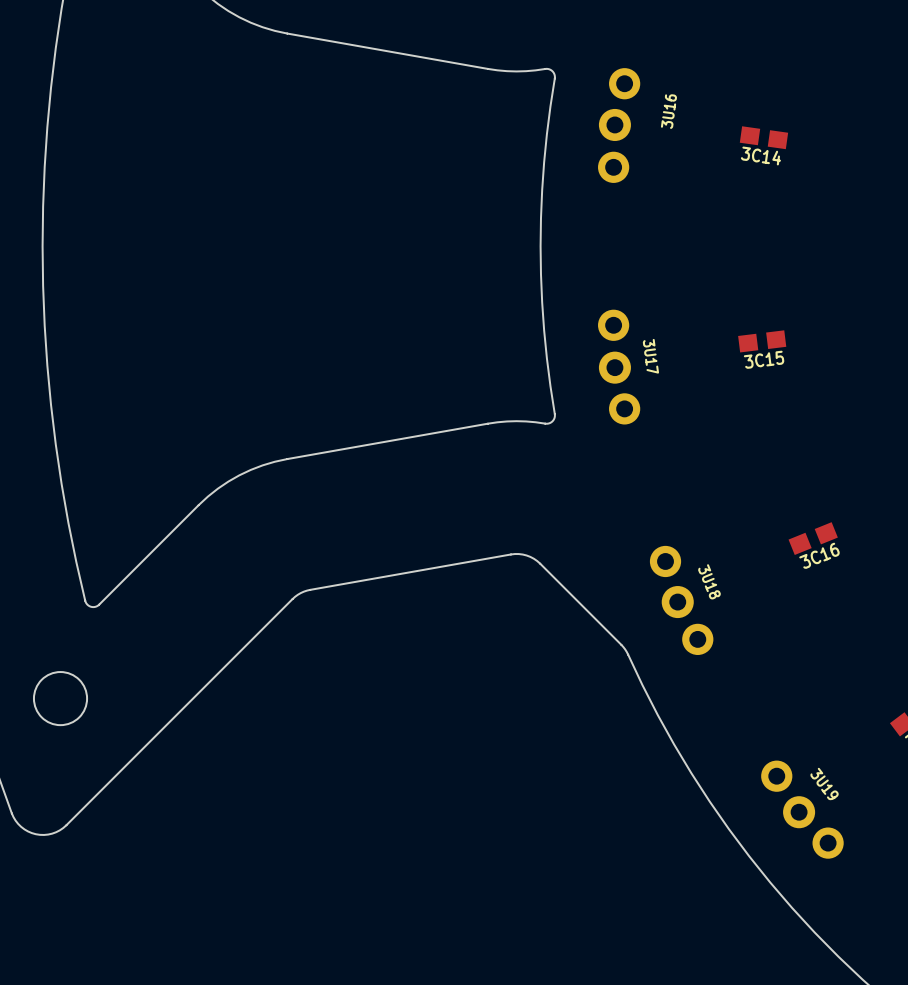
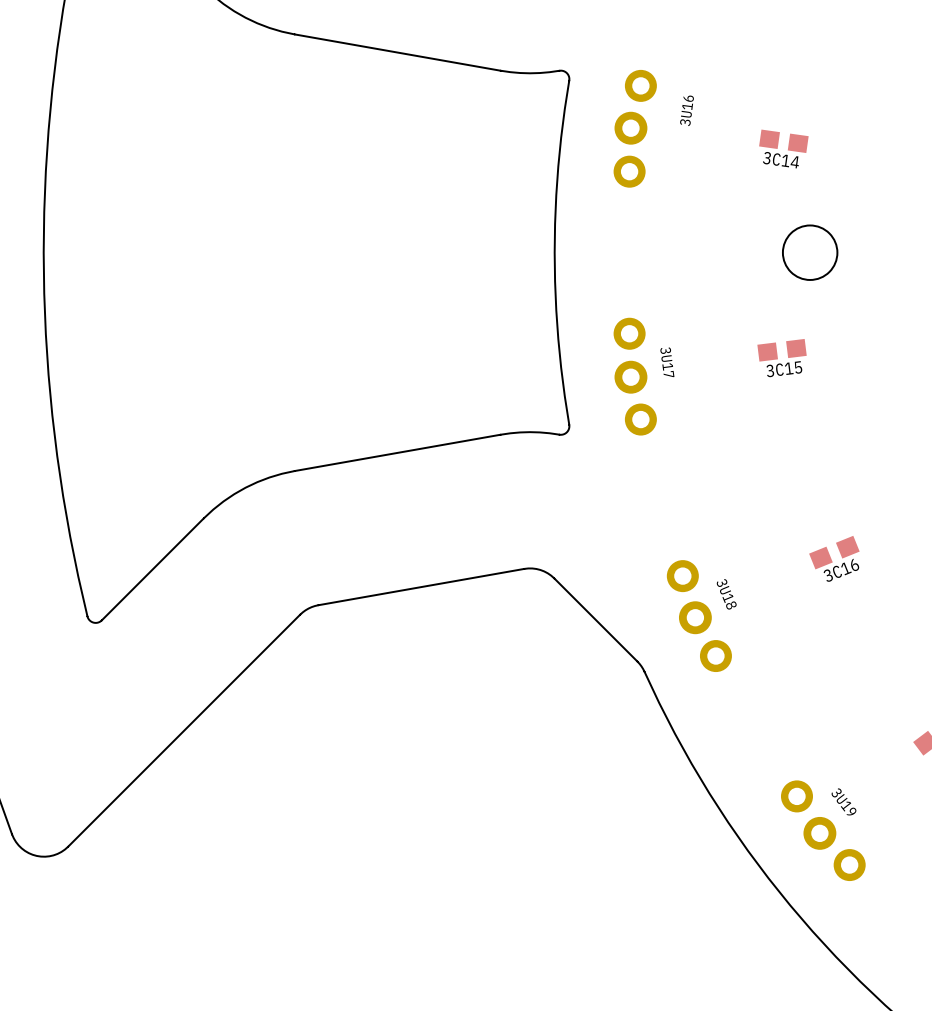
round board edge: none -> [782, 225, 838, 280]
round board edge: [33, 672, 88, 726] -> none

